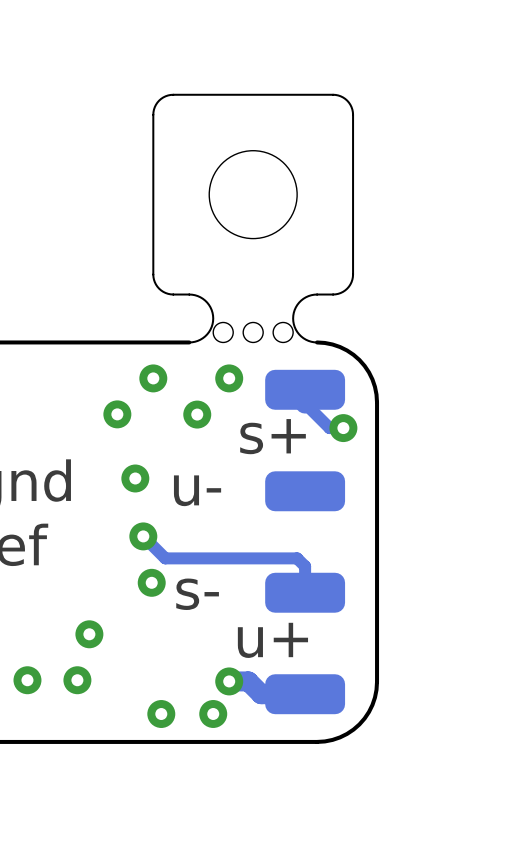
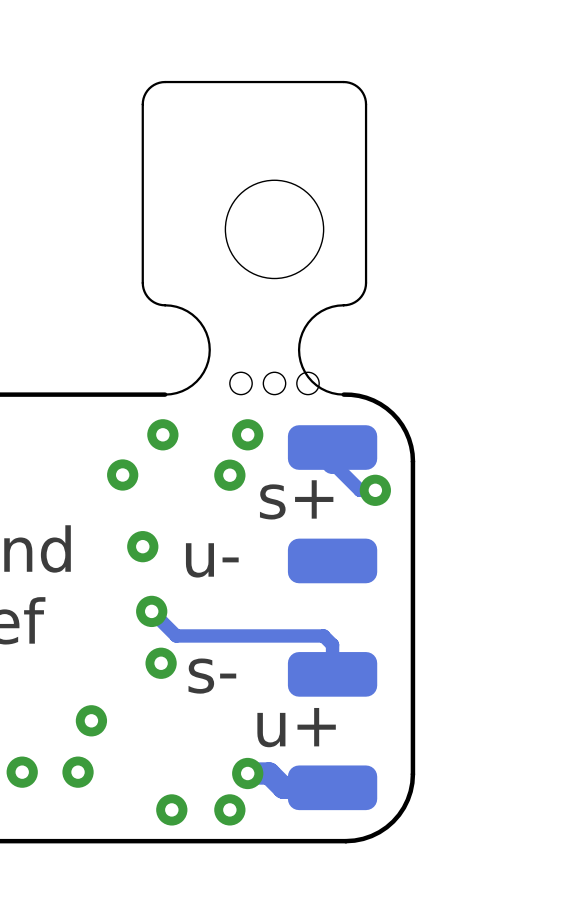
board edge: (155, 342) (197, 340) (208, 332) (213, 318) (210, 307) (202, 298) (192, 294) (165, 293) (159, 288) (153, 279) (153, 114) (157, 102) (163, 97) (173, 94) (338, 95) (347, 100) (352, 112) (352, 279) (347, 288) (340, 293) (314, 294) (303, 298) (295, 307) (293, 321) (297, 332) (305, 339) (340, 347) (359, 360) (372, 379) (377, 402) -> (165, 394) (182, 391) (196, 381) (206, 367) (209, 349) (206, 332) (196, 318) (182, 308) (153, 302) (147, 296) (143, 288) (142, 104) (145, 93) (153, 85) (165, 82) (349, 82) (361, 90) (365, 101) (365, 285) (363, 294) (354, 302) (326, 308) (312, 318) (305, 327) (300, 338) (299, 355) (302, 367) (308, 377) (321, 388) (332, 393) (366, 397) (380, 404) (392, 413) (402, 425) (409, 439) (412, 461)
via position: (197, 414) -> (229, 475)

